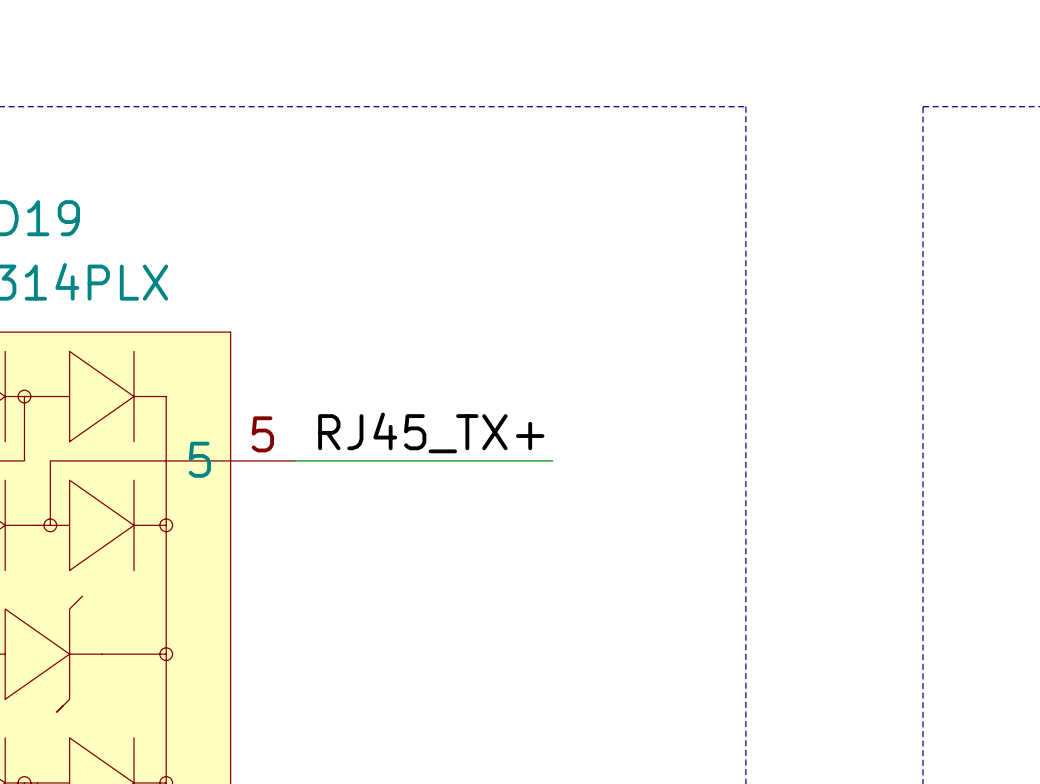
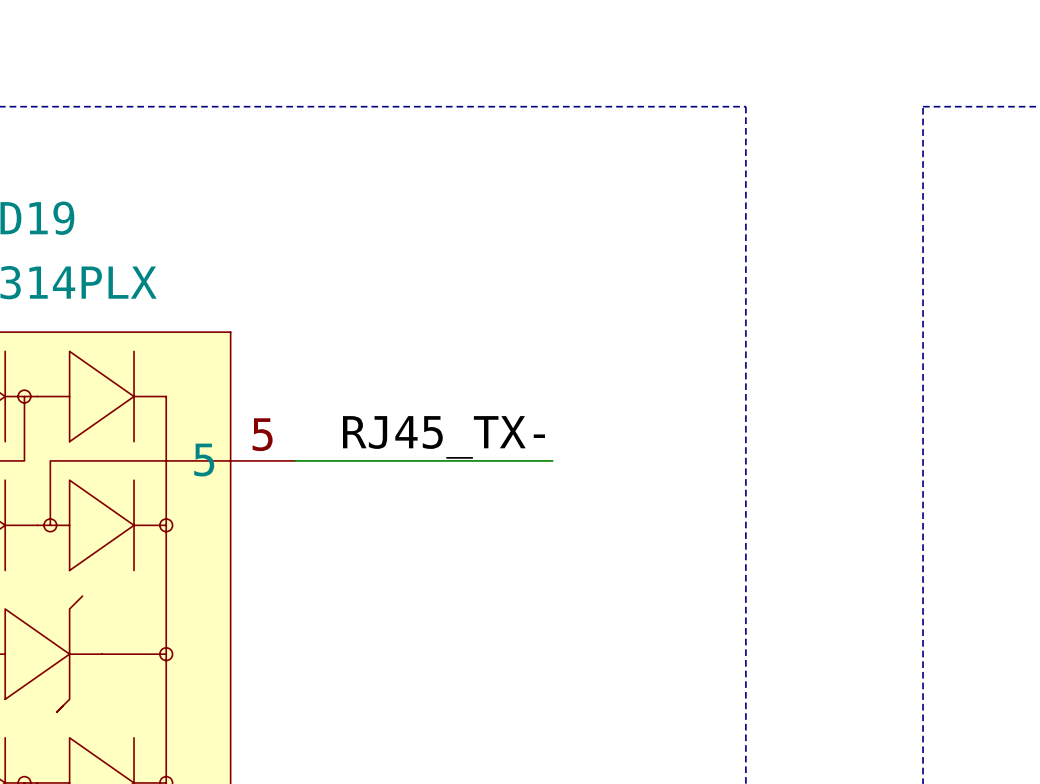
label: RJ45_TX+ (431, 432) -> RJ45_TX- (444, 437)

